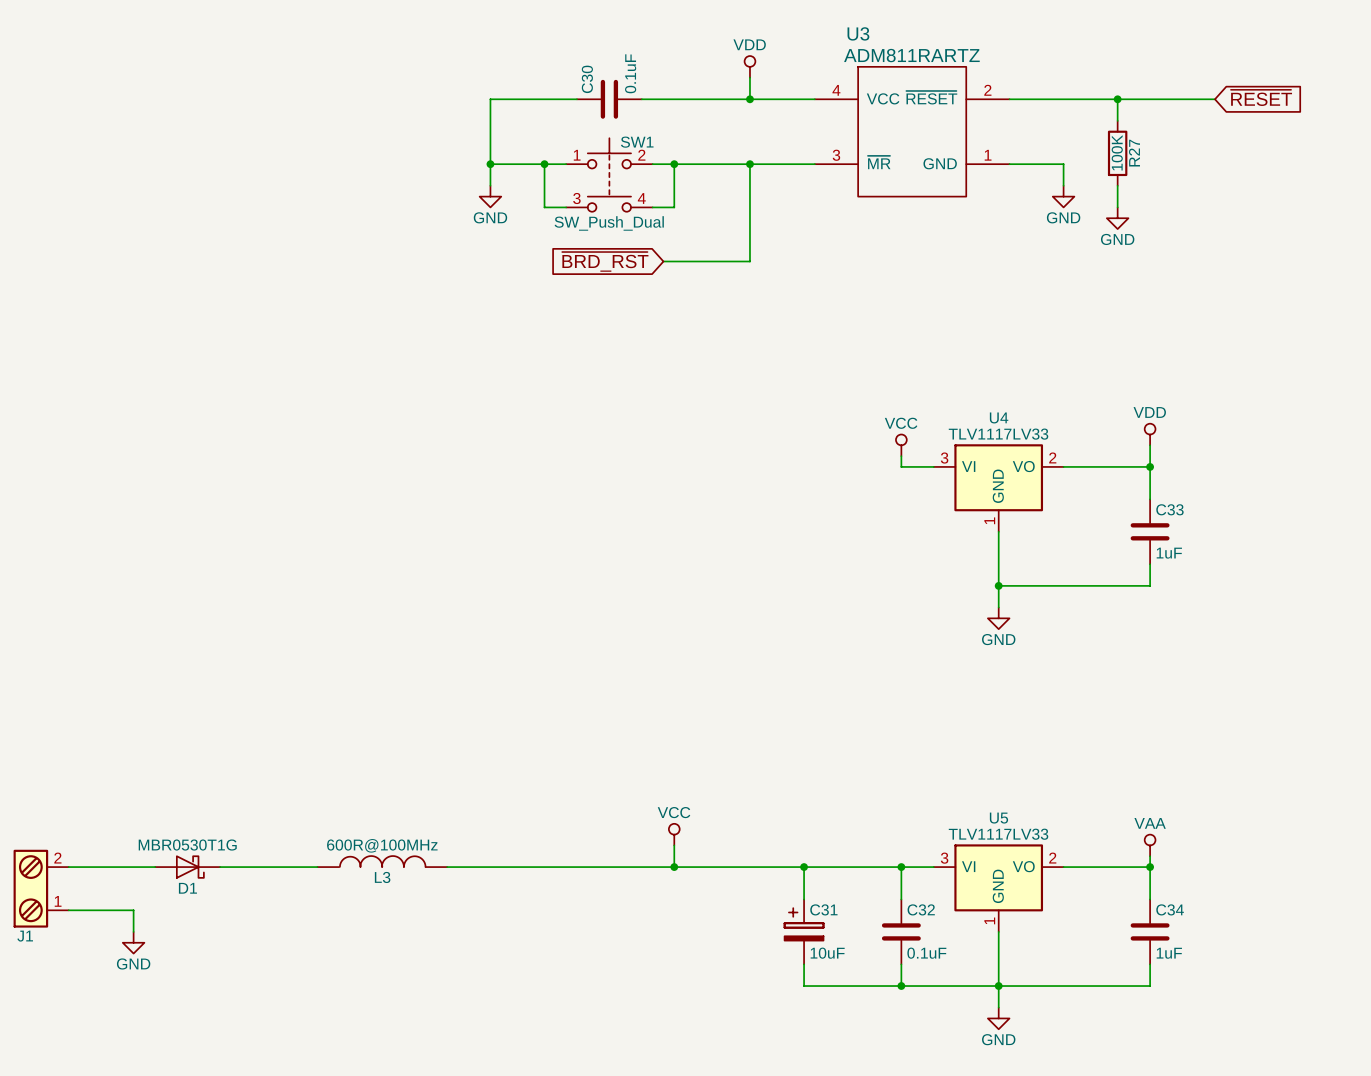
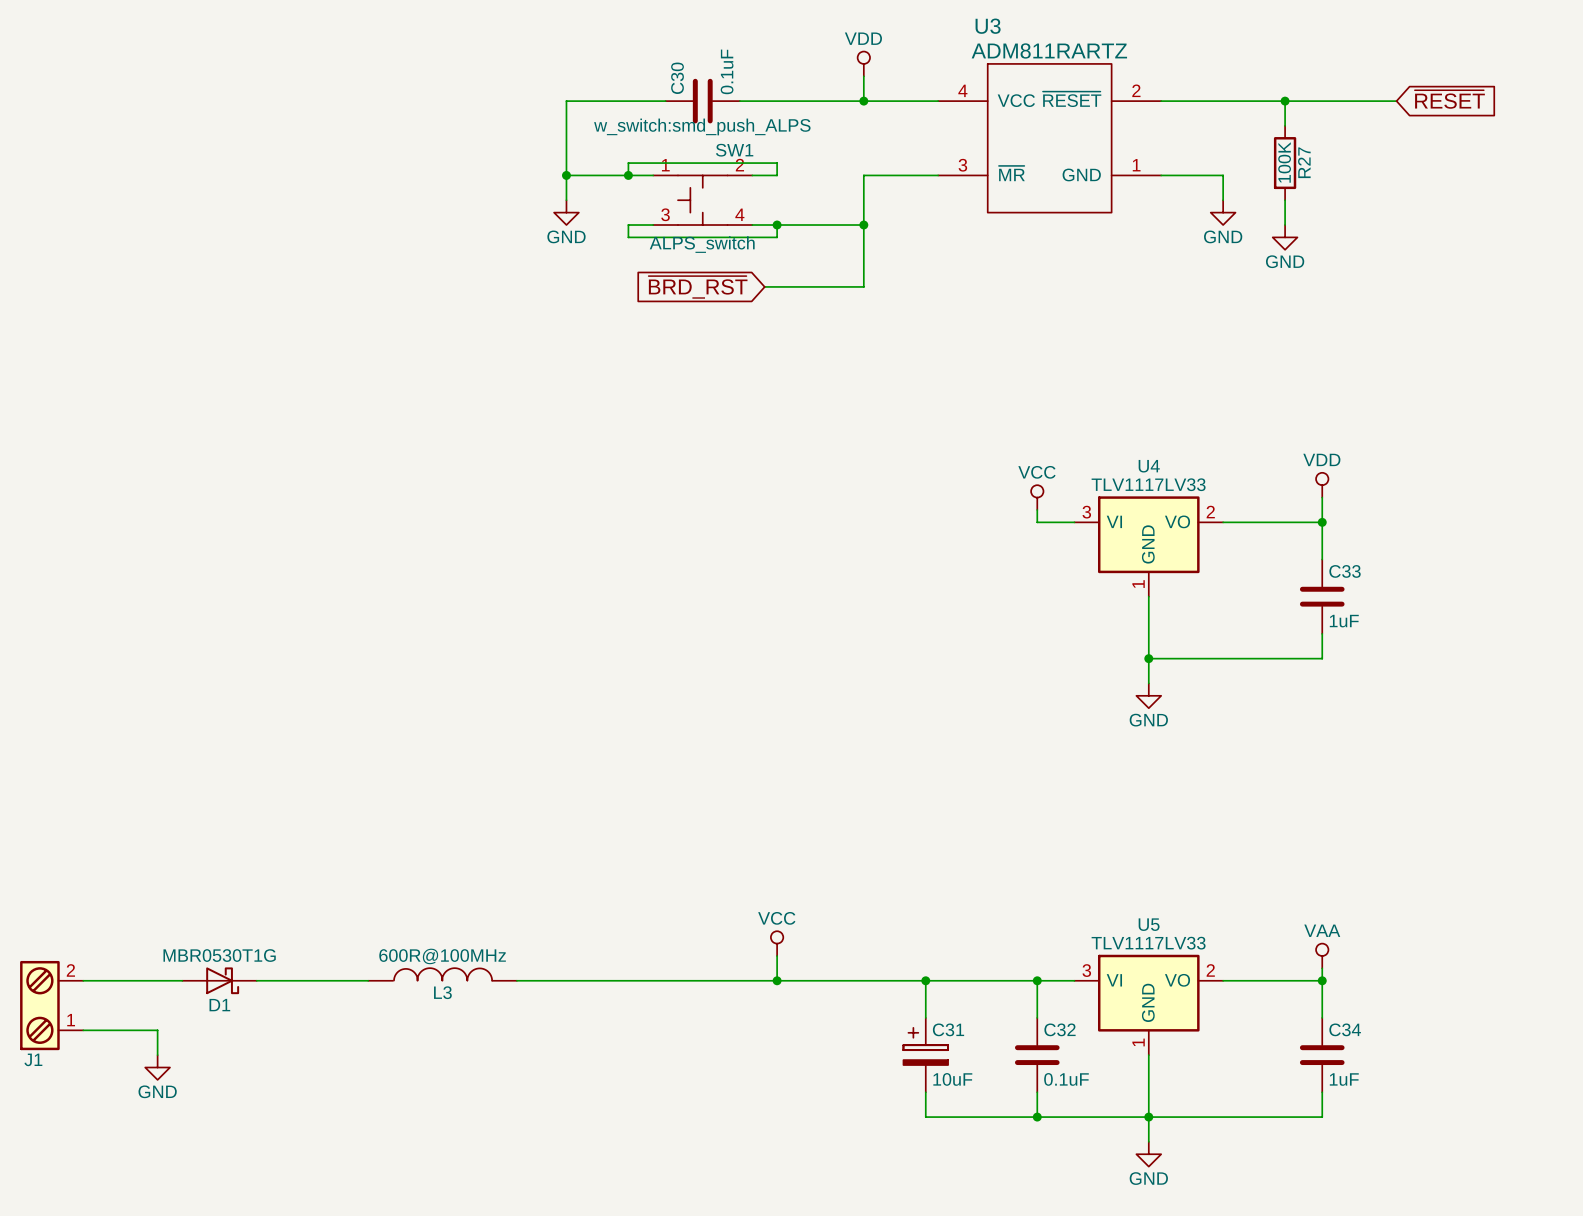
SW1 text: none -> w_switch:smd_push_ALPS (702, 126)
SW1 symbol: [566, 138, 653, 212] -> [653, 175, 753, 226]
wire: (544, 164) (544, 207) -> (628, 175) (628, 163) (777, 163) (777, 175)
junction position: (674, 164) -> (777, 225)
wire: (749, 164) (674, 164) (674, 207) -> none
junction position: (749, 164) -> (863, 225)
wire: none -> (628, 225) (628, 237) (777, 237) (777, 225) (863, 225)
SW1 value: SW_Push_Dual (609, 223) -> ALPS_switch (702, 244)

